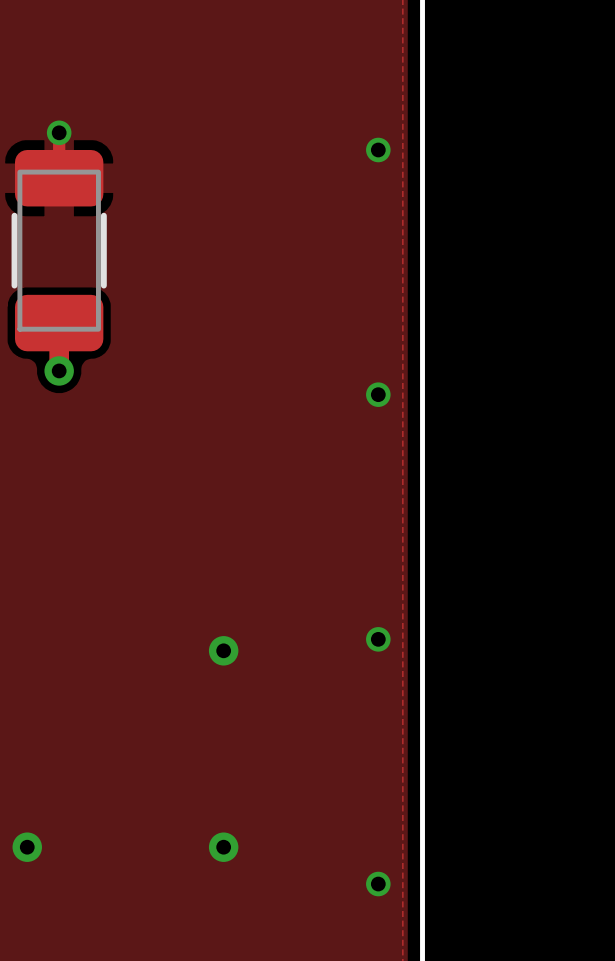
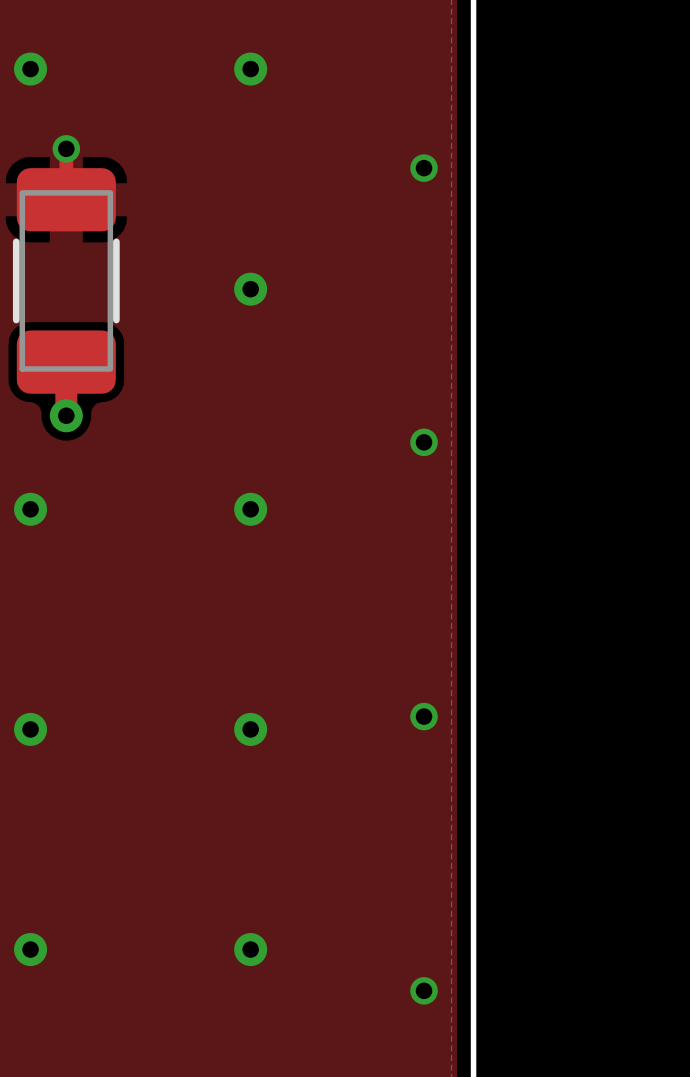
via: none -> (30, 69)
via: none -> (250, 69)
via: none -> (250, 289)
via: none -> (30, 509)
via: none -> (250, 509)
via: none -> (30, 729)

